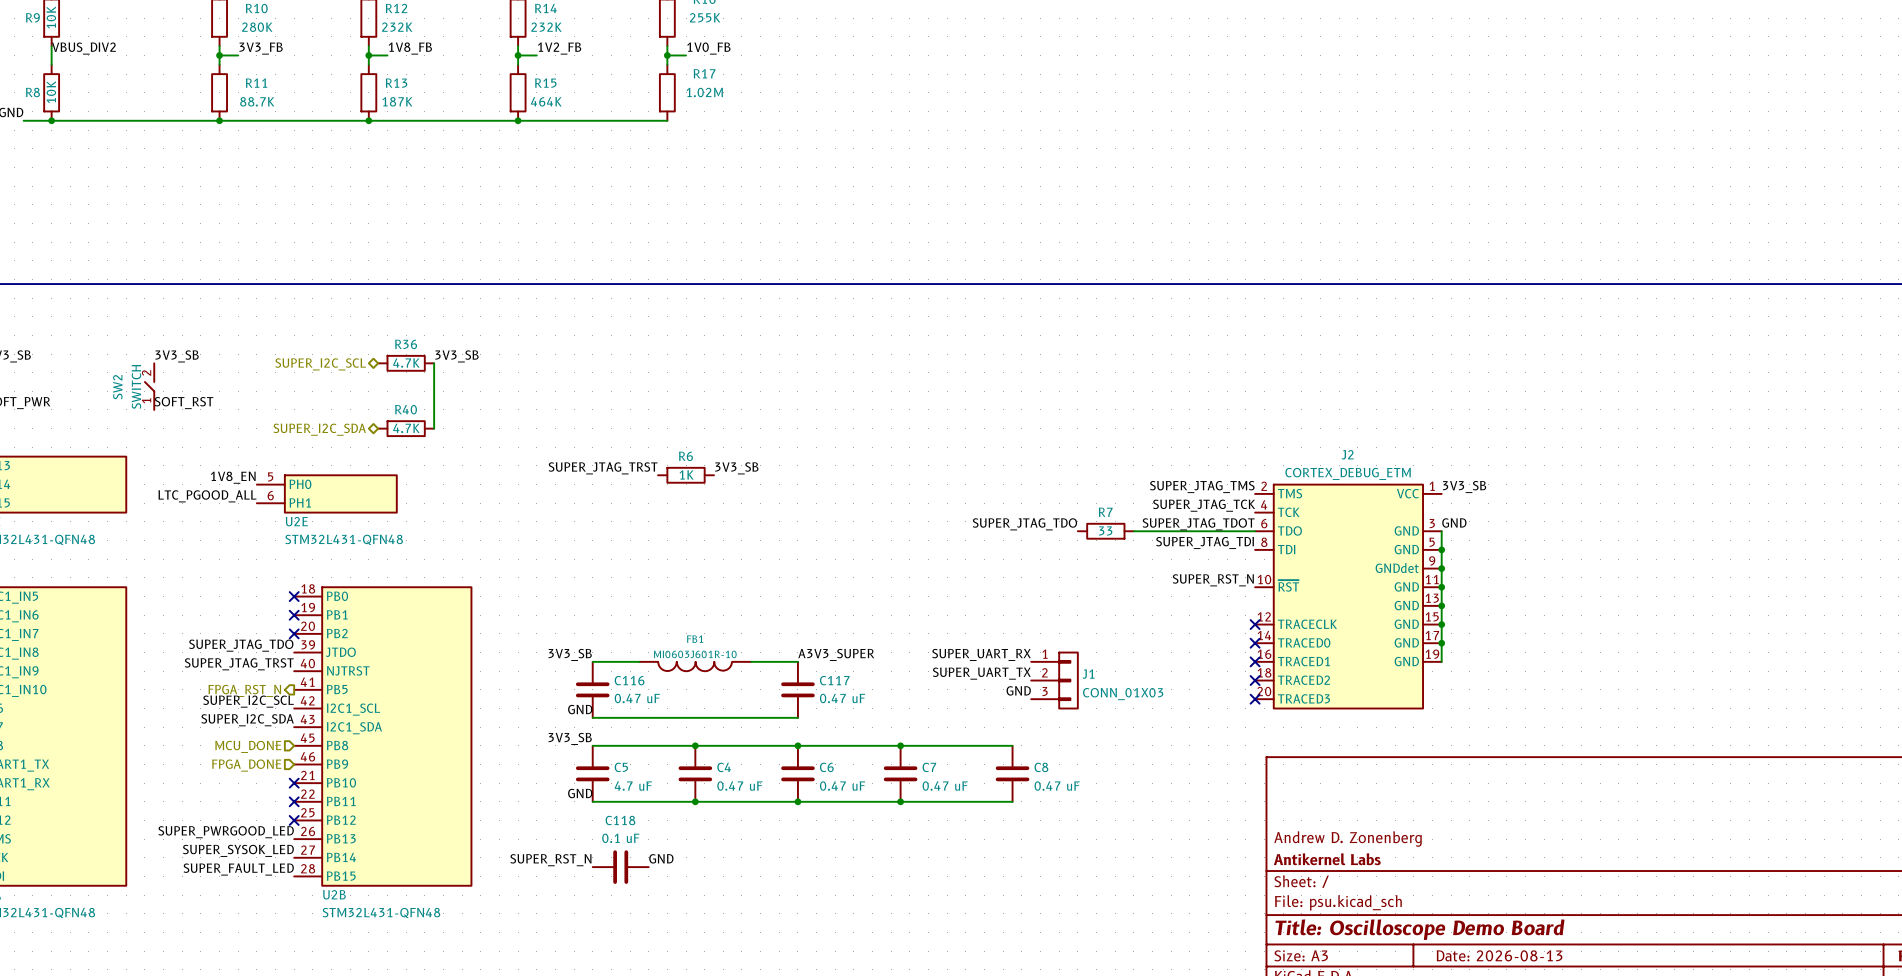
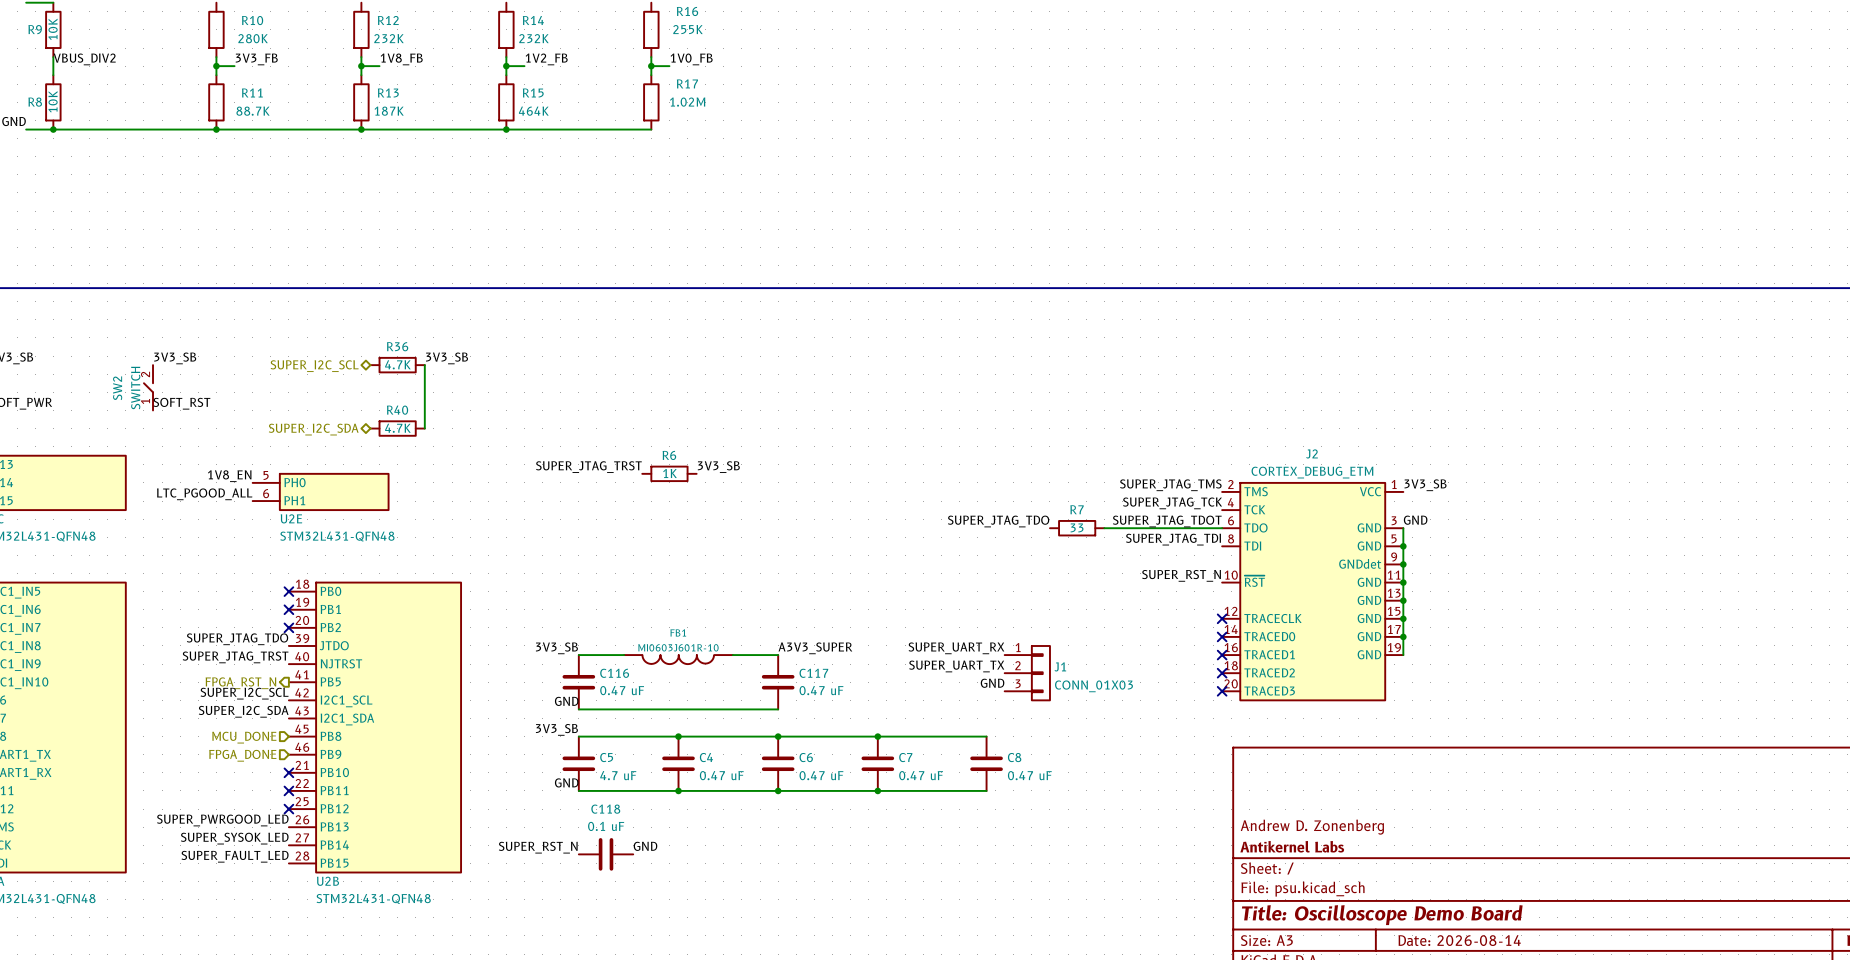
title block: Date: 2026-08-13 (1499, 955) -> Date: 2026-08-14 (1459, 940)

